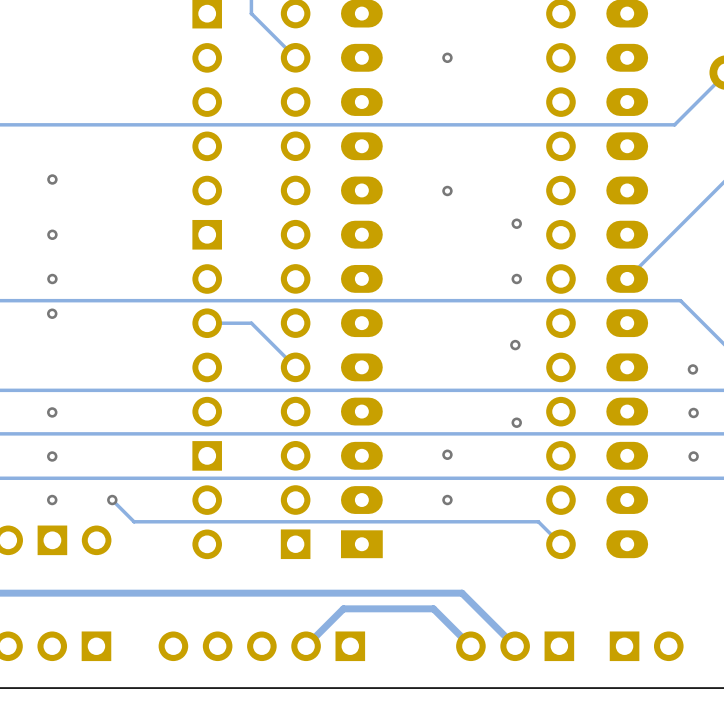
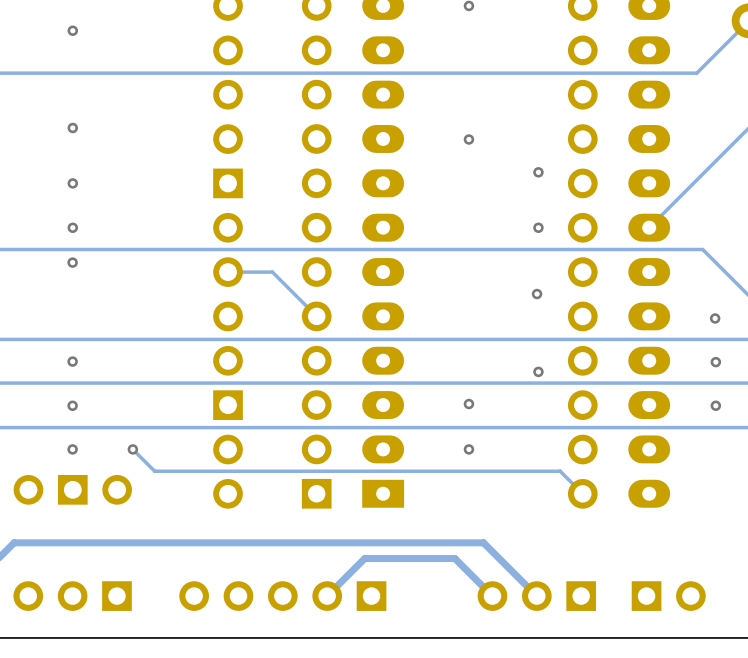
via: none -> (72, 30)

